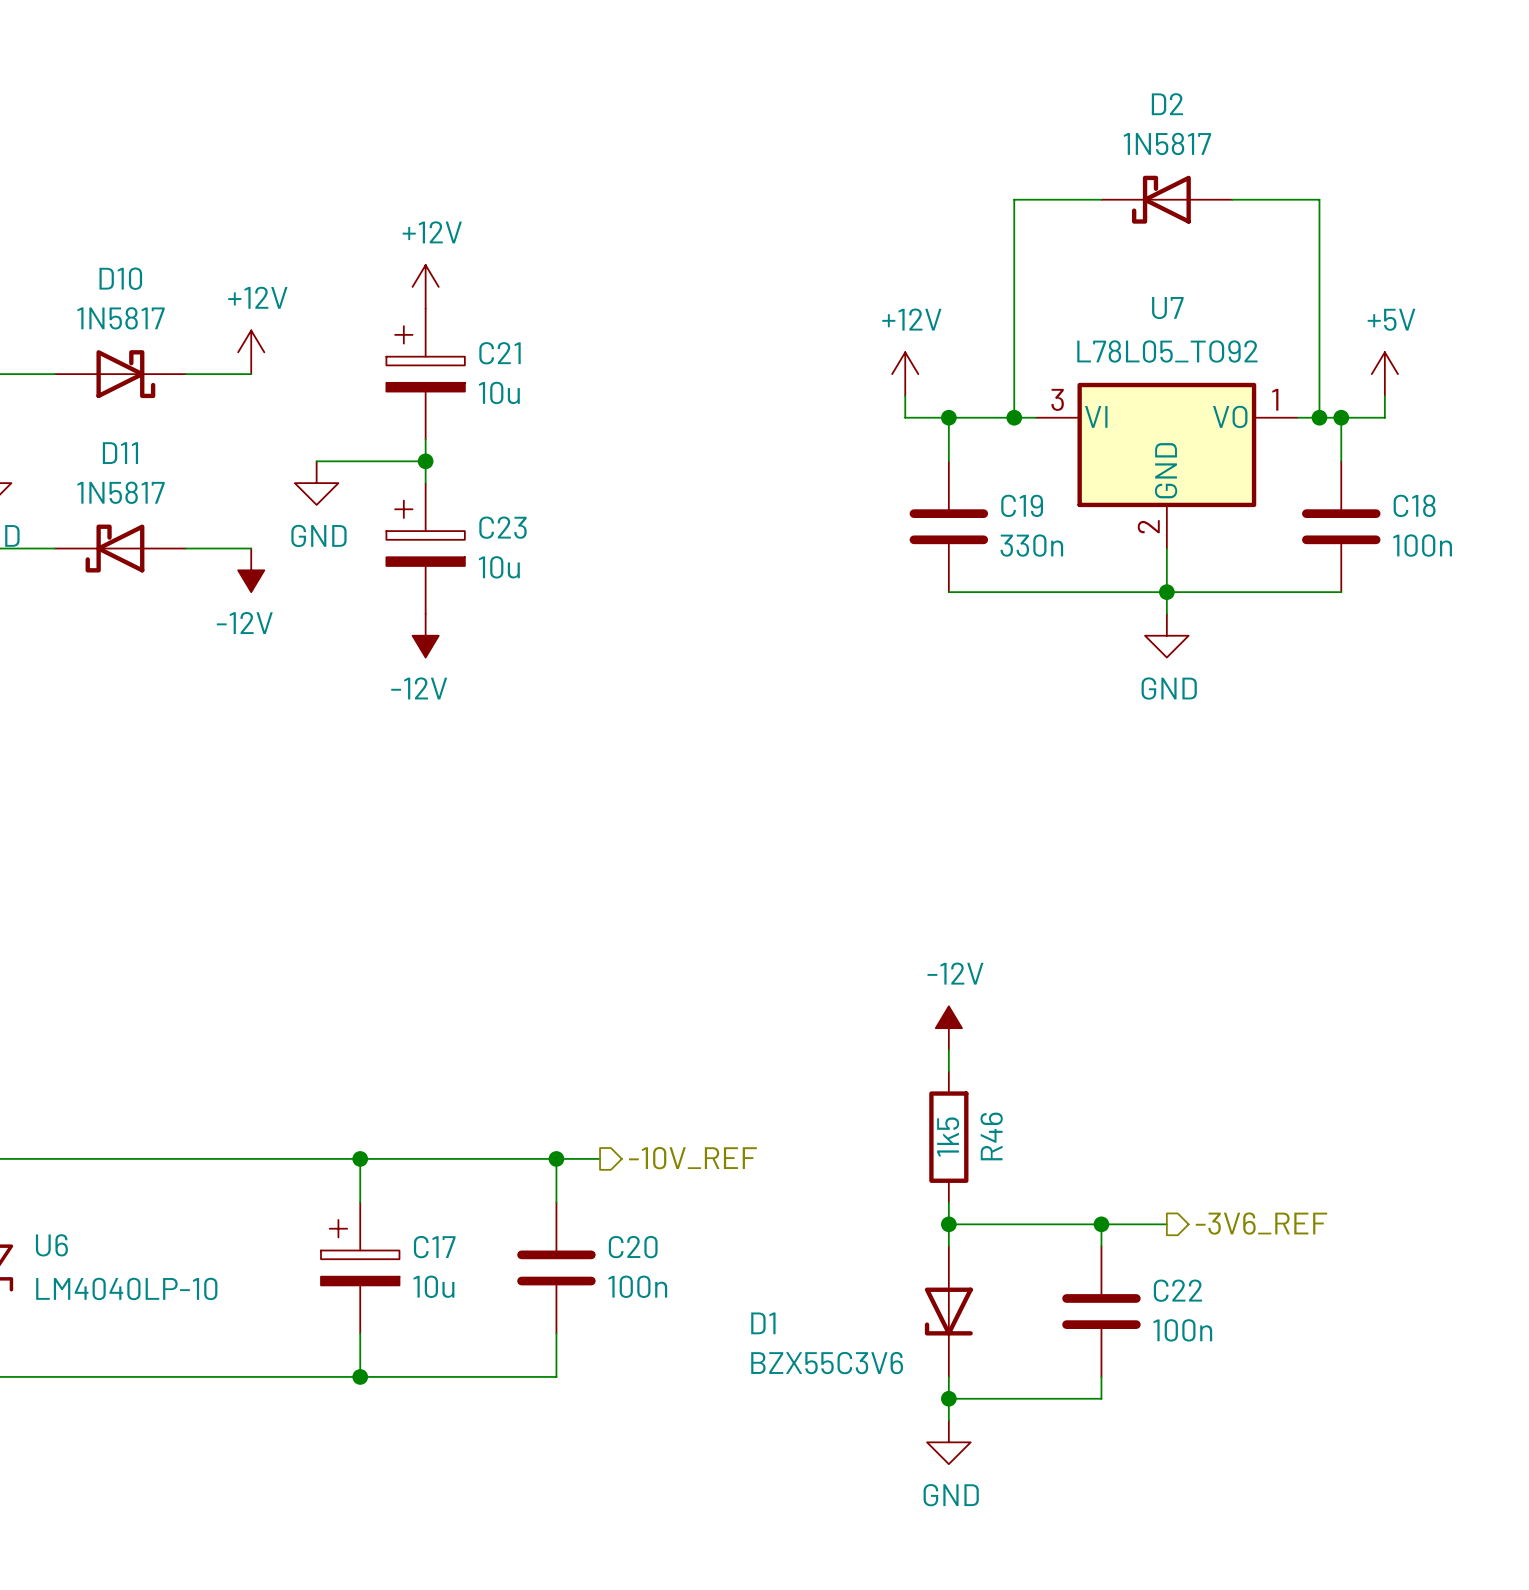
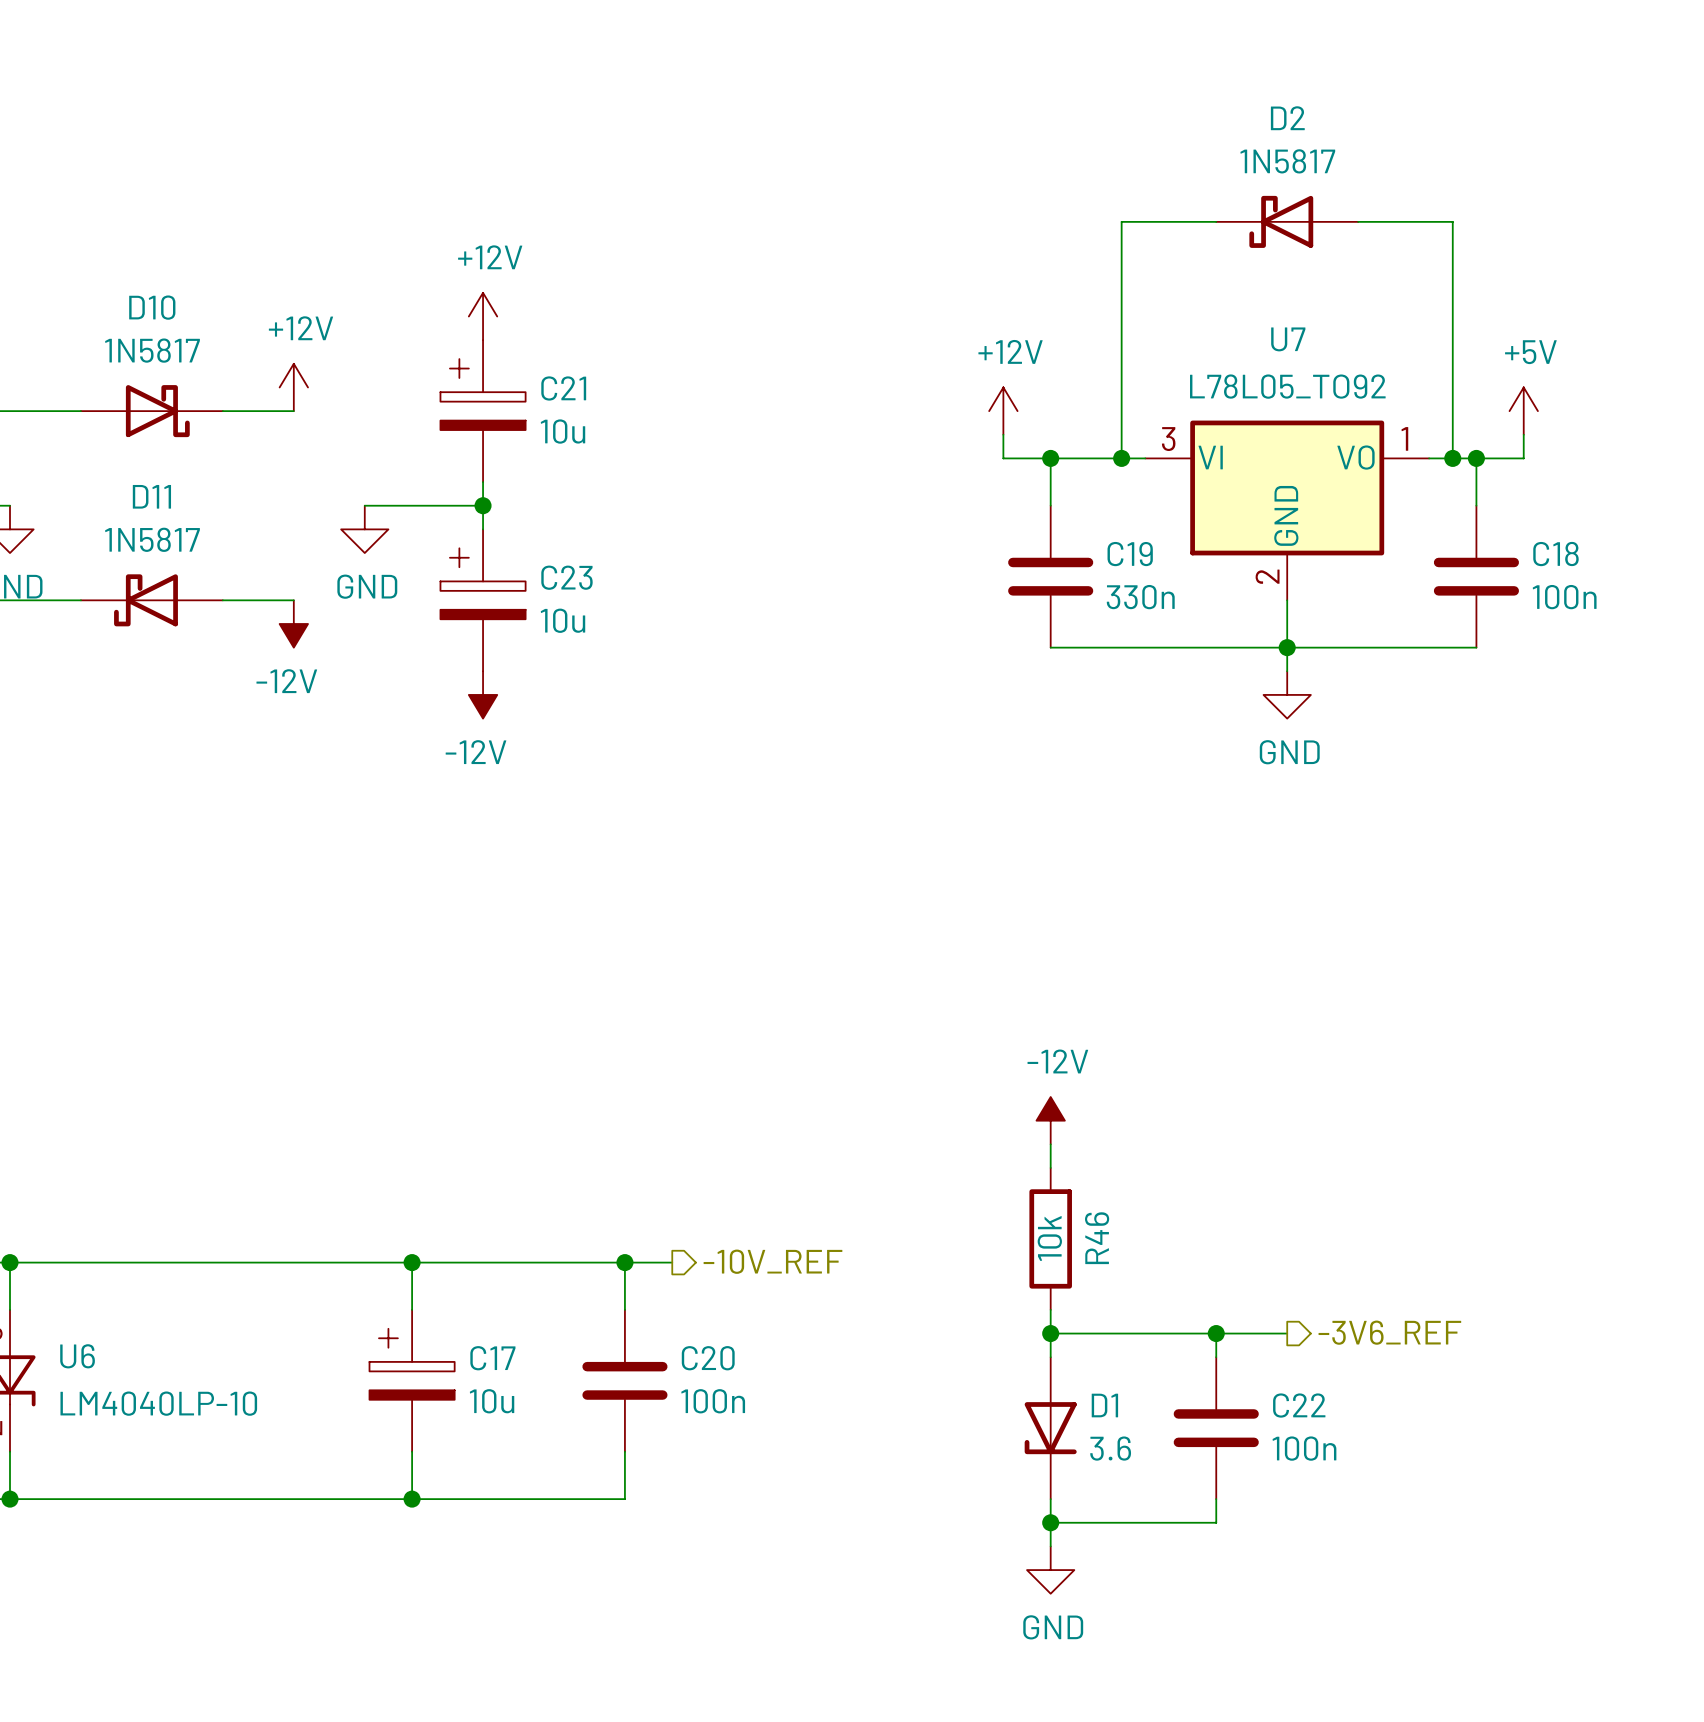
R46 value: 1k5 (948, 1137) -> 10k (1049, 1238)
D1 name position: D1 (763, 1323) -> D1 (1104, 1405)
D1 value: BZX55C3V6 (827, 1363) -> 3.6 (1110, 1448)

